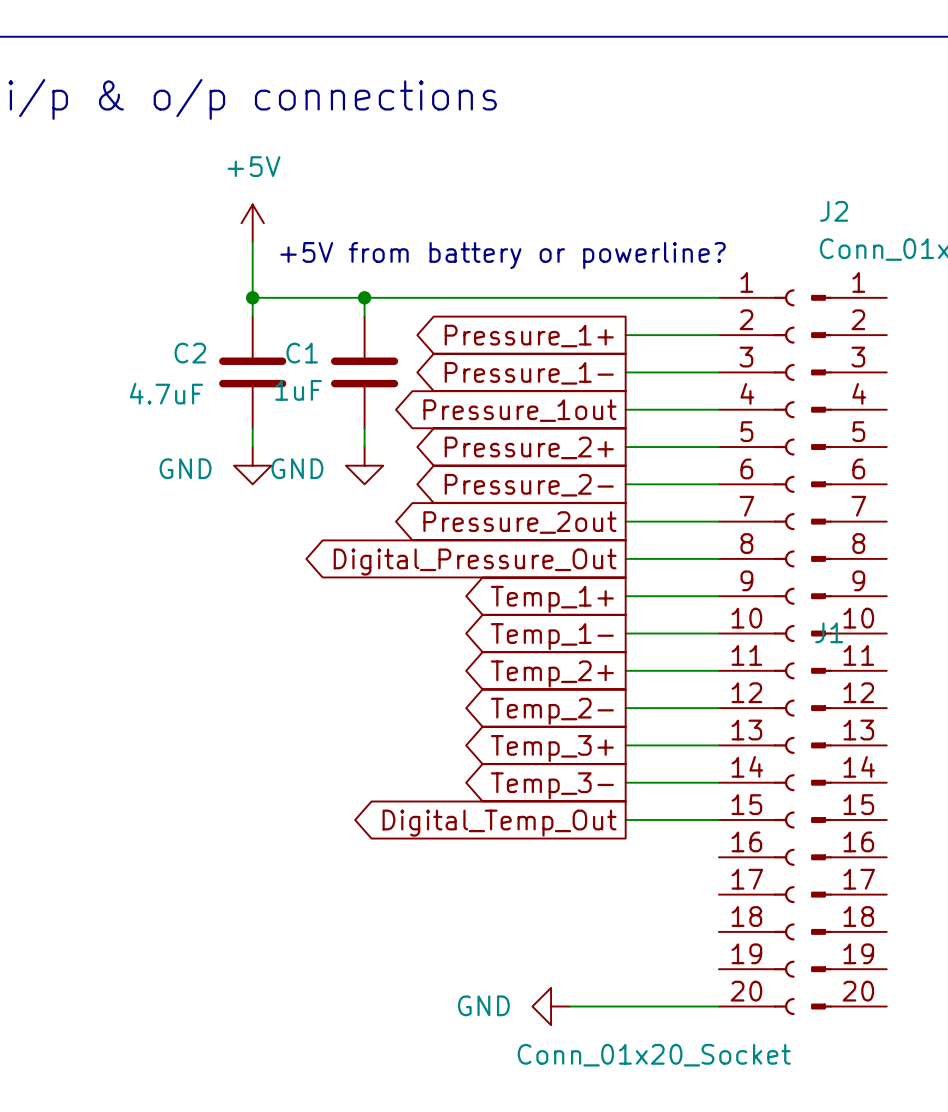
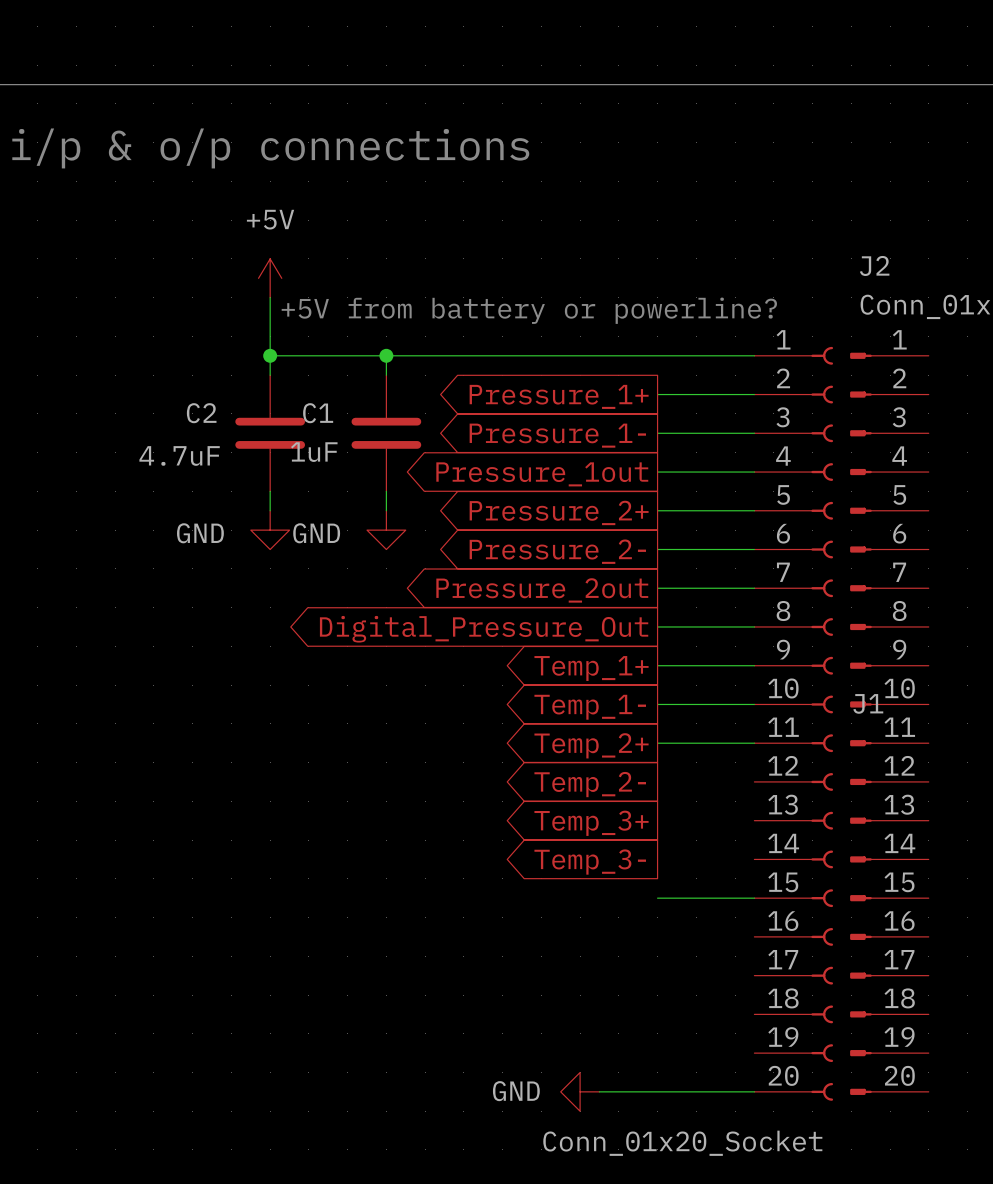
wire: (625, 708) (718, 708) -> none
wire: (625, 745) (718, 745) -> none
wire: (625, 782) (718, 782) -> none
global label: Digital_Temp_Out (499, 823) -> none

